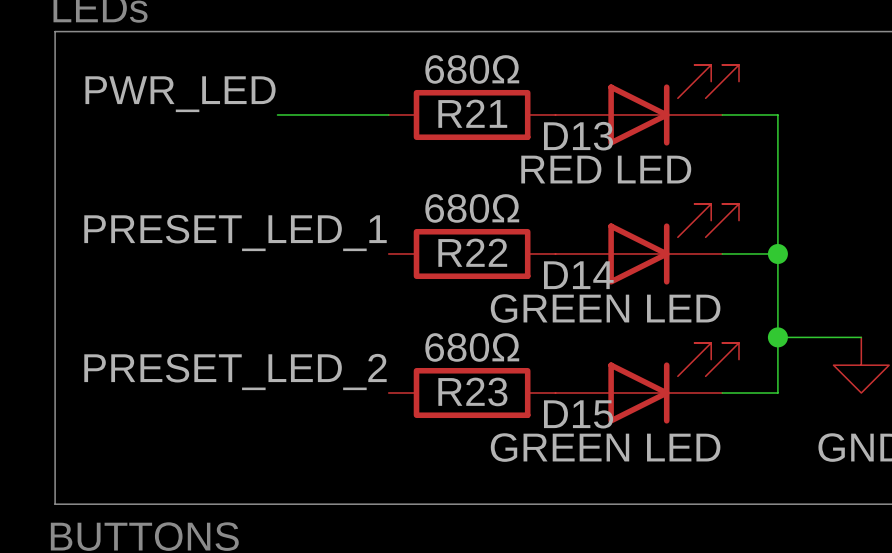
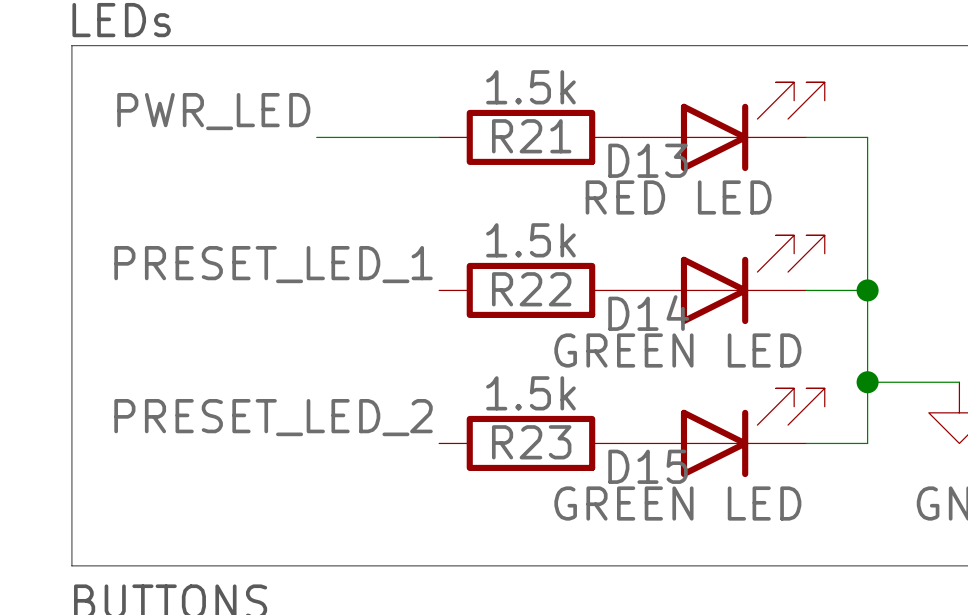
R21 value: 680Ω (472, 69) -> 1.5k (530, 87)
R22 value: 680Ω (472, 208) -> 1.5k (530, 240)
R23 value: 680Ω (472, 347) -> 1.5k (530, 393)

